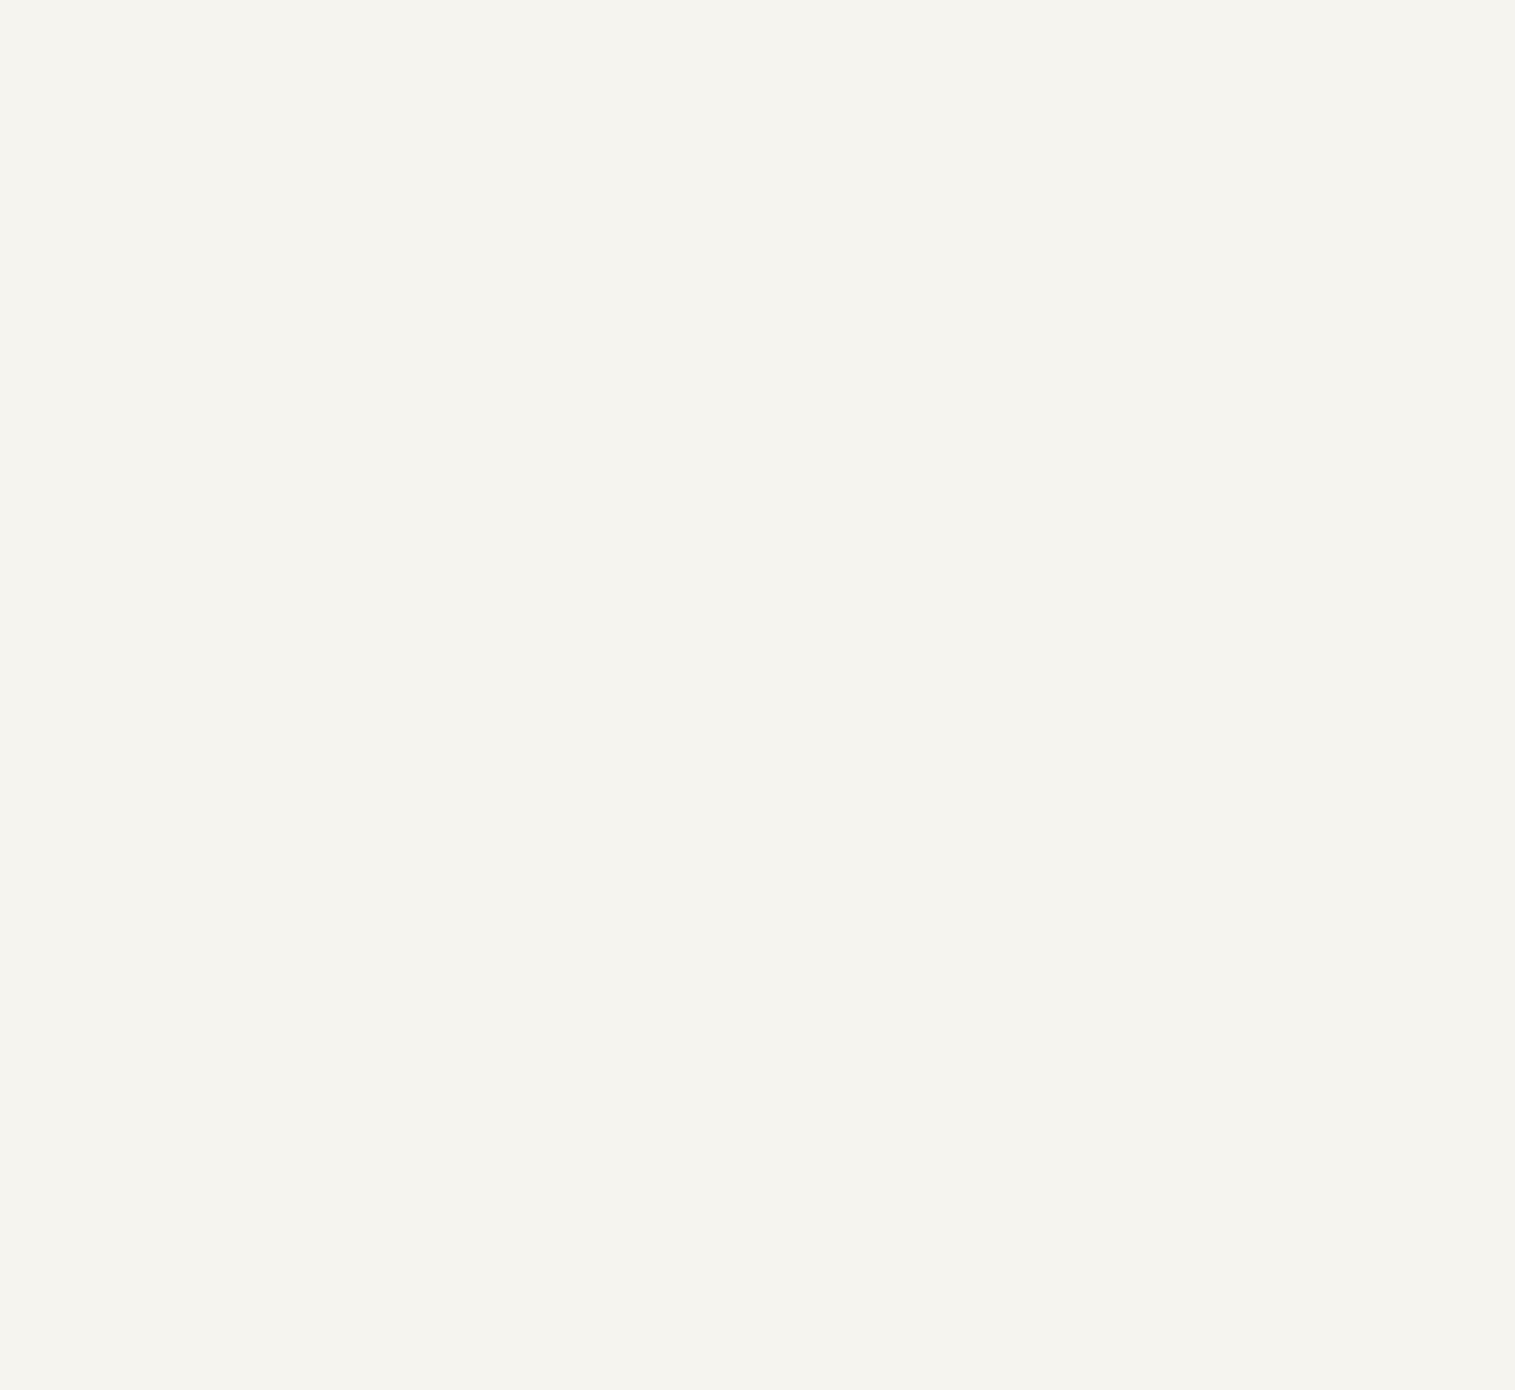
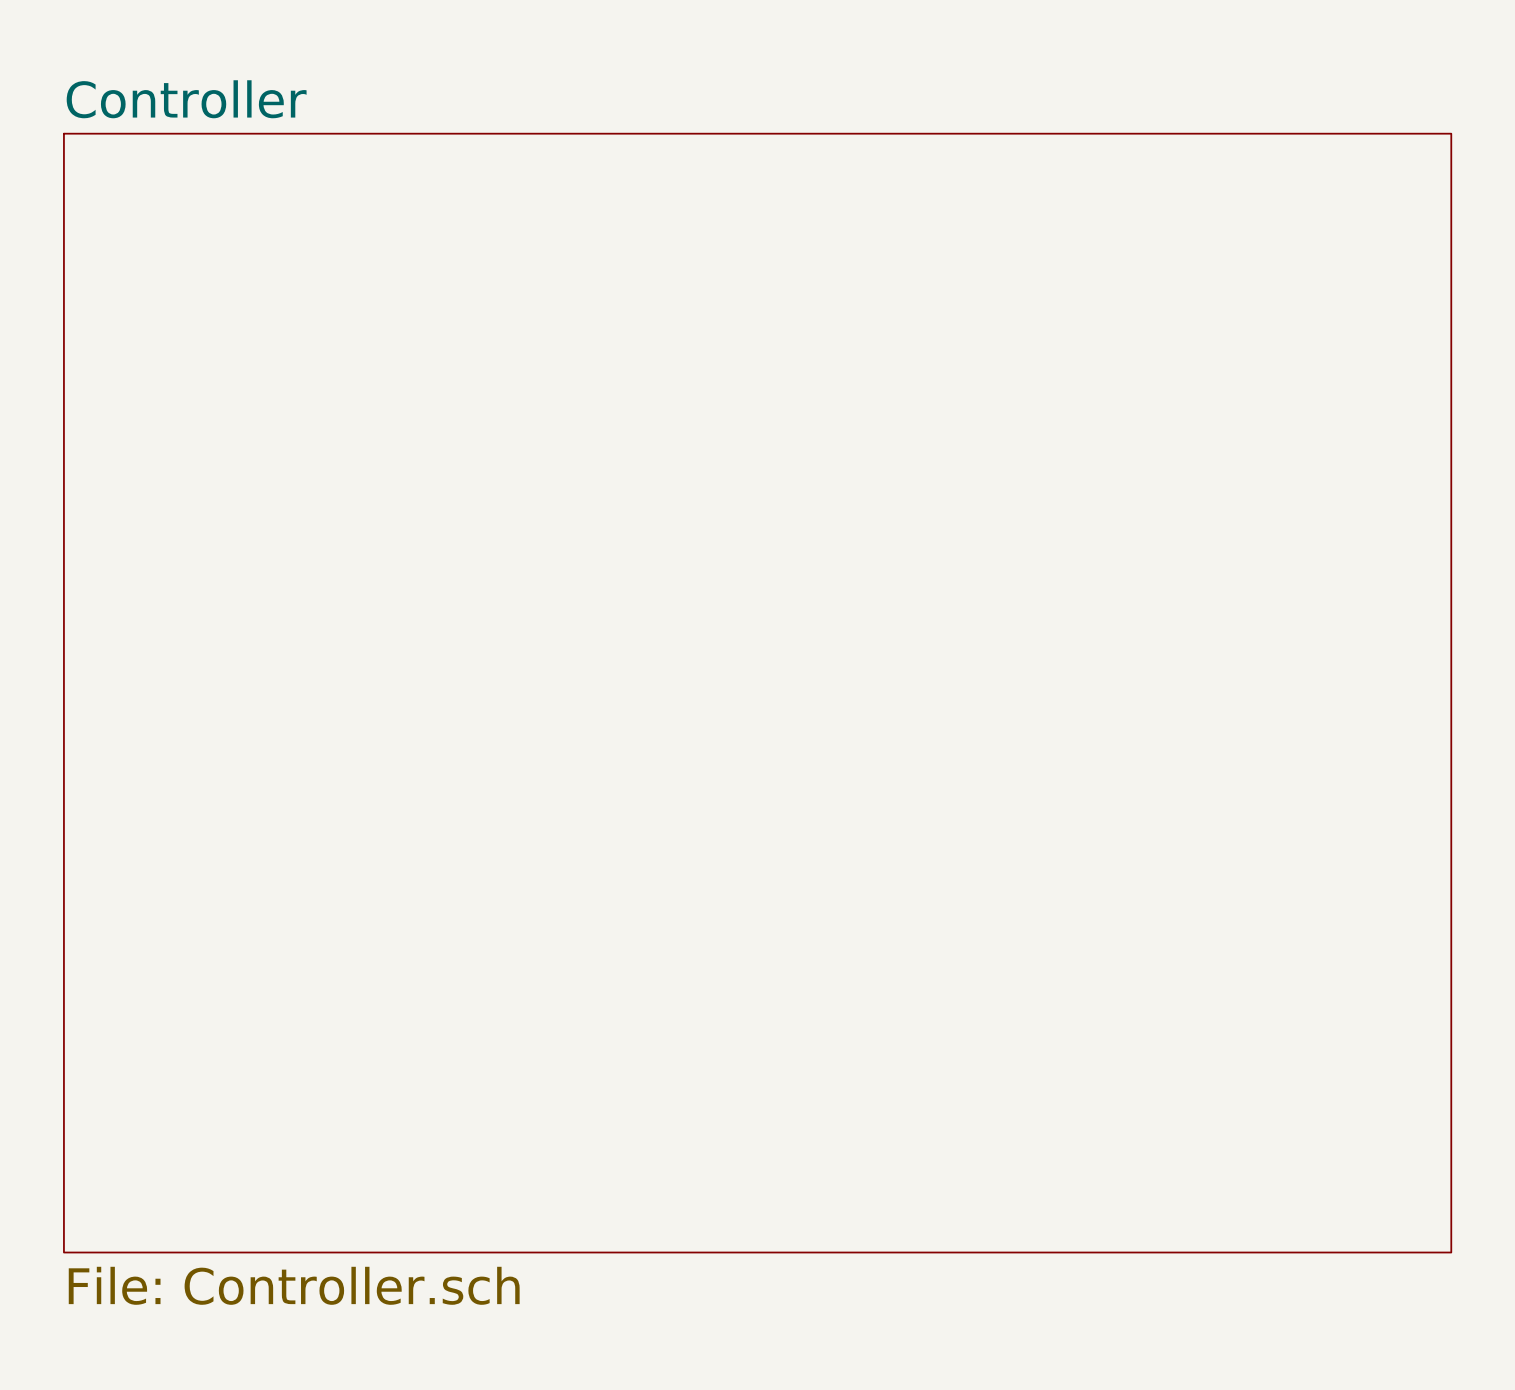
sheet Controller: none -> File: Controller.sch (757, 693)

